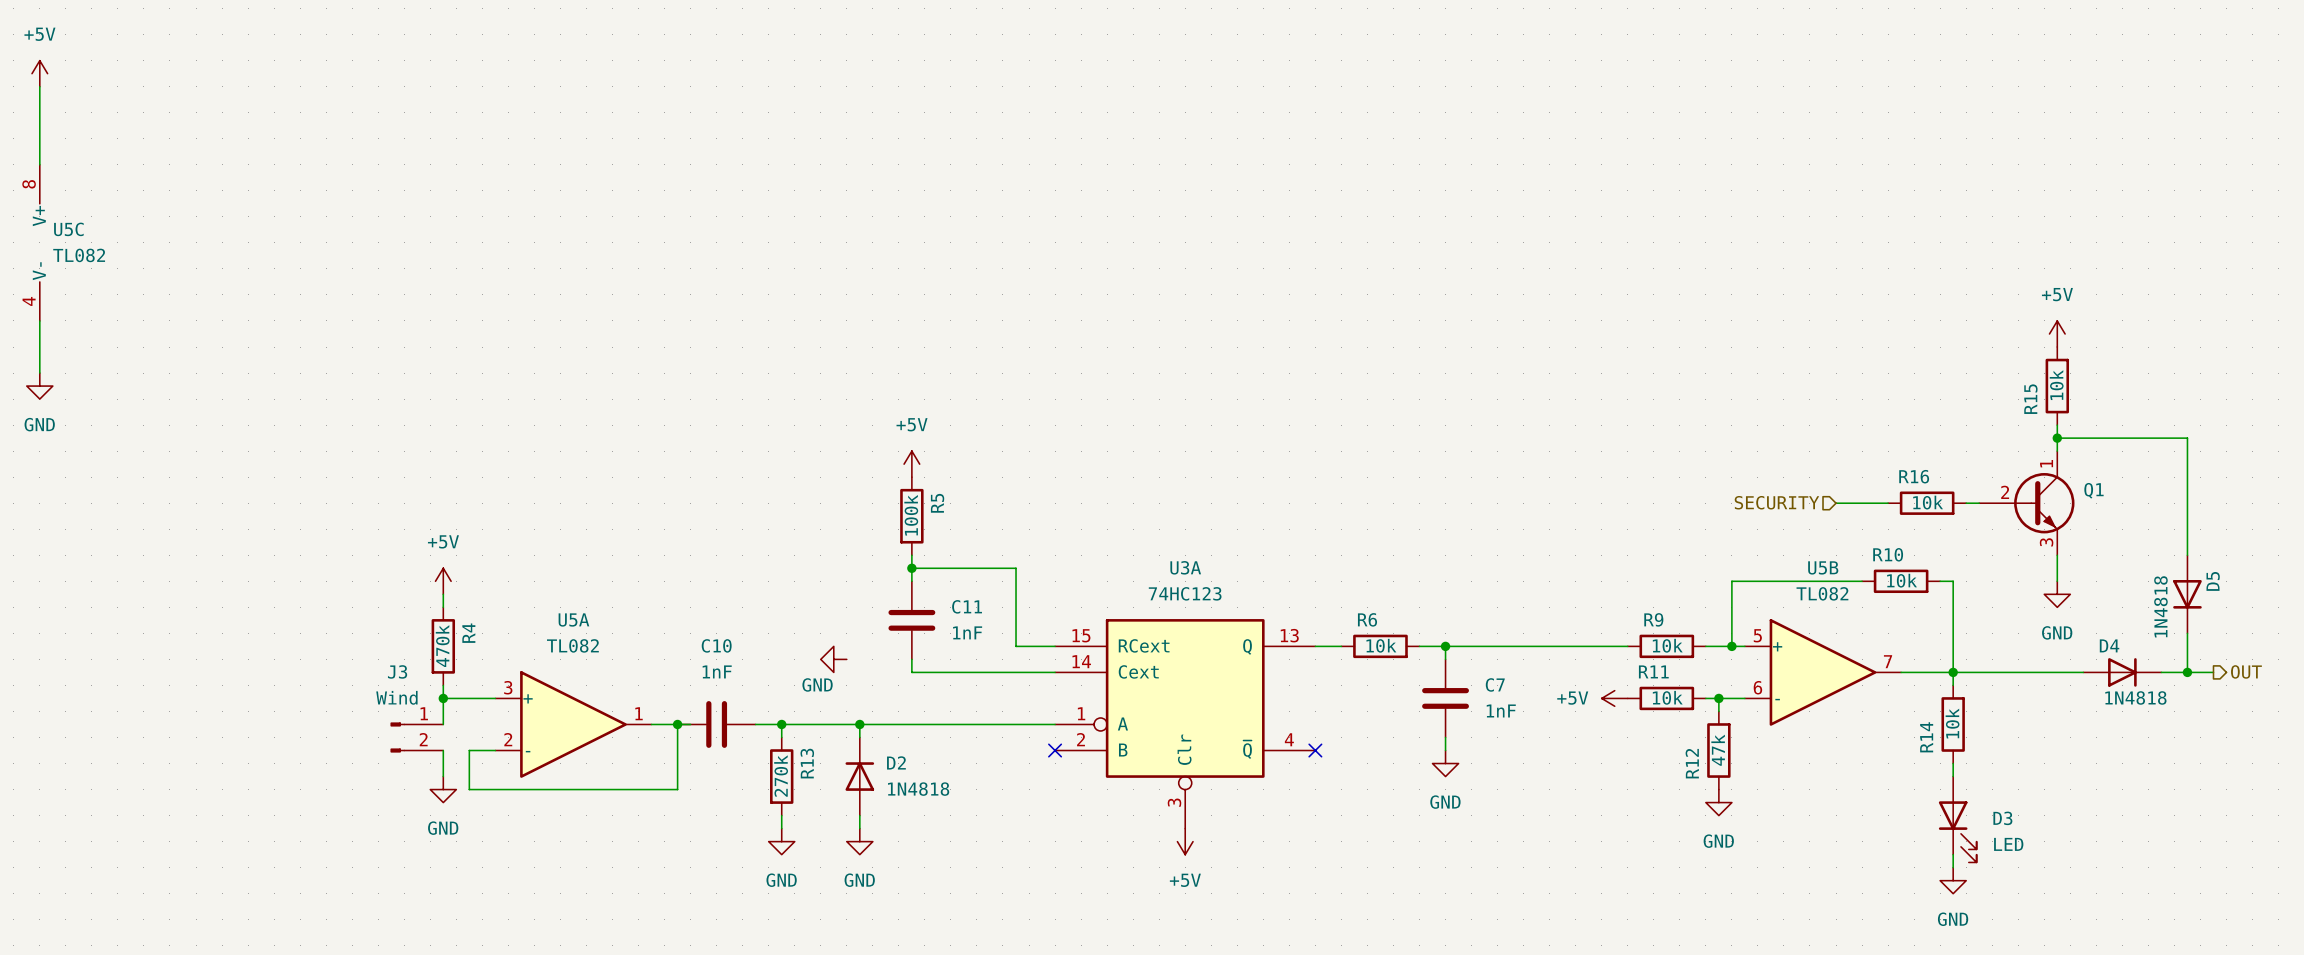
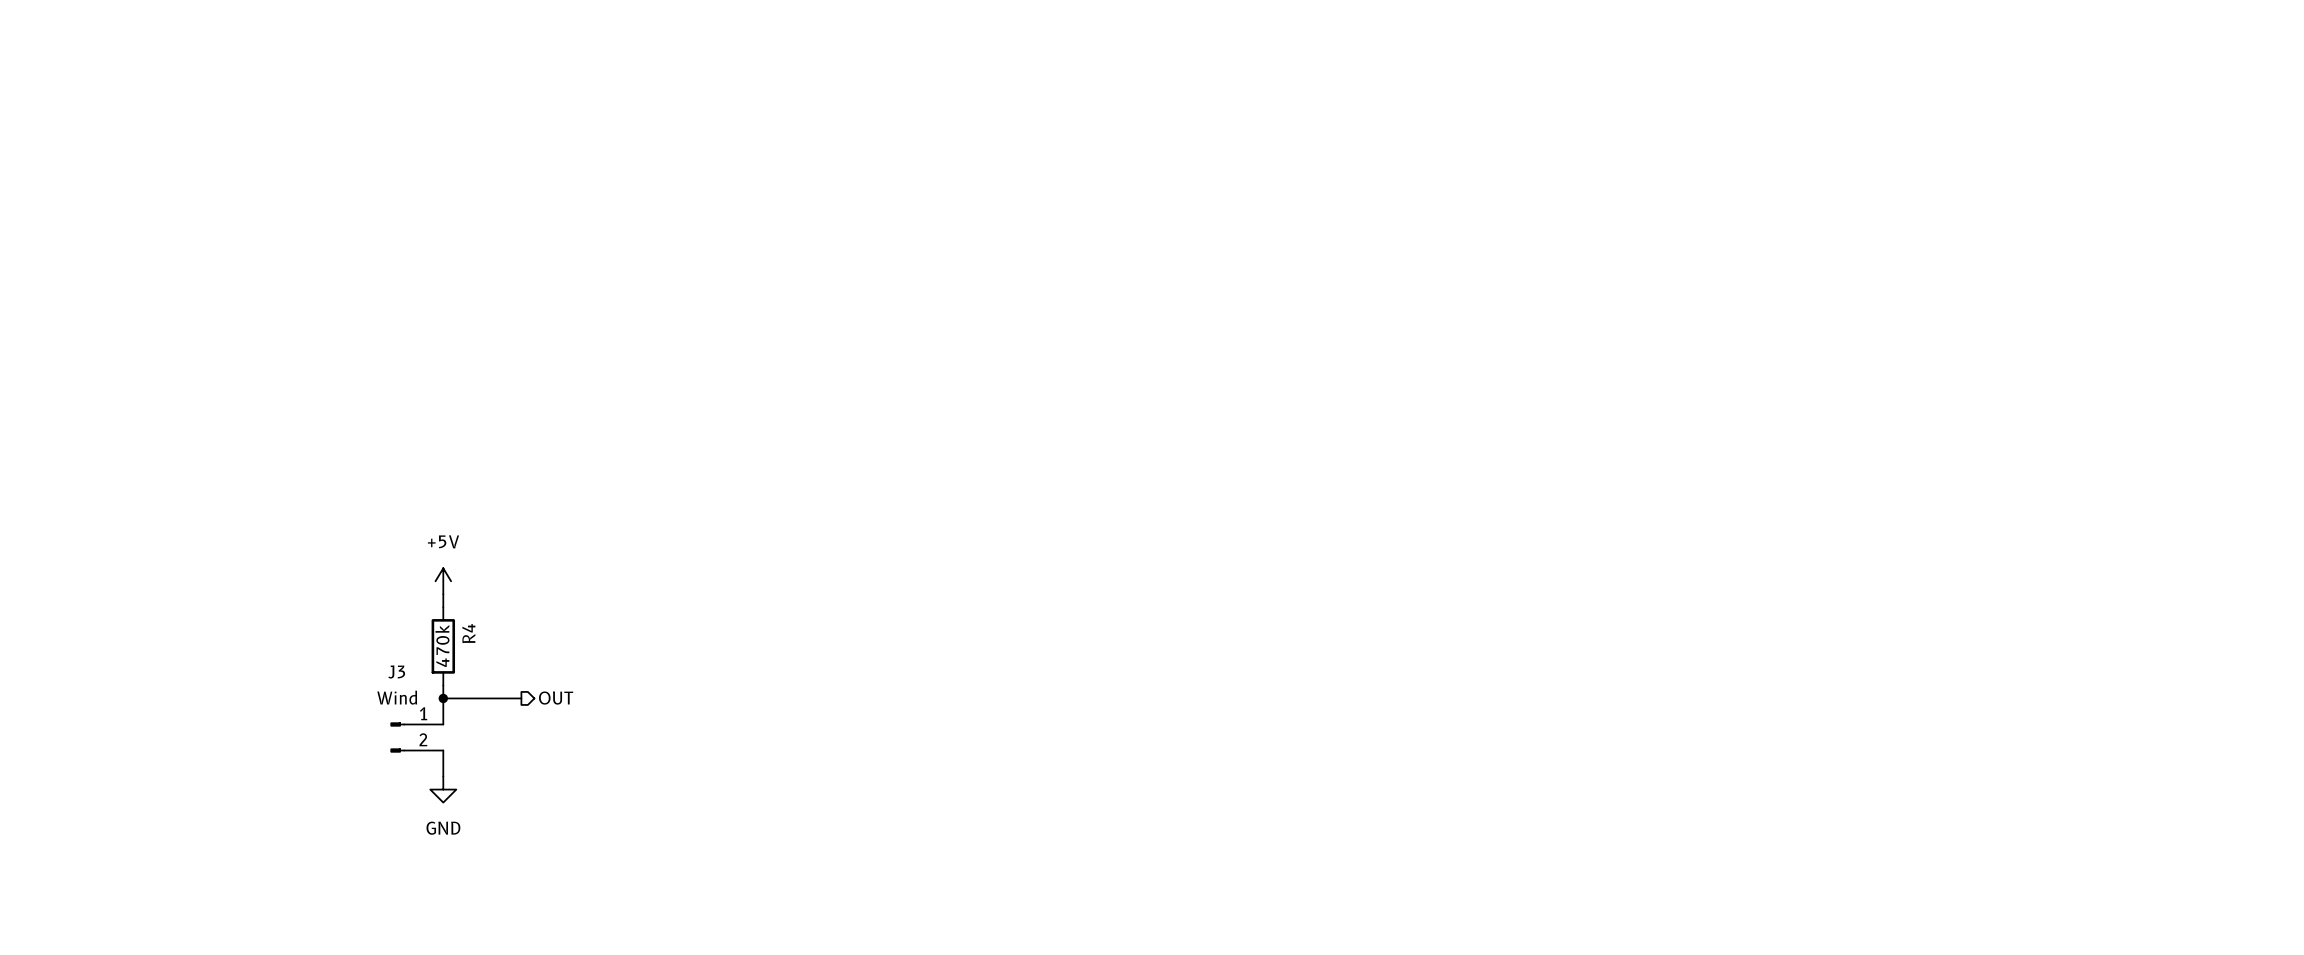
power symbol: +5V (39, 73) -> none
wire: (39, 86) (39, 164) -> none
U5C: TL082 (39, 242) -> none
wire: (39, 320) (39, 373) -> none
power symbol: +5V (2057, 334) -> none
power symbol: GND (39, 386) -> none
R15: 10k (2057, 386) -> none
wire: (2057, 425) (2057, 451) -> none
wire: (2057, 438) (2187, 438) (2187, 555) -> none
junction: (2057, 438) -> none
power symbol: +5V (911, 464) -> none
hierarchical label: SECURITY (1776, 502) -> none
wire: (1836, 503) (1888, 503) -> none
R16: 10k (1927, 503) -> none
wire: (1966, 503) (1979, 503) -> none
Q1: (2026, 503) -> none
R5: 100k (911, 516) -> none
wire: (911, 555) (911, 581) -> none
wire: (2057, 555) (2057, 581) -> none
wire: (911, 568) (1016, 568) (1016, 646) (1055, 646) -> none
junction: (911, 568) -> none
wire: (1862, 581) (1731, 581) (1731, 646) -> none
R10: 10k (1901, 581) -> none
wire: (1940, 581) (1953, 581) (1953, 685) -> none
power symbol: GND (2057, 594) -> none
D5: 1N4818 (2187, 594) -> none
C11: 1nF (911, 620) -> none
wire: (2187, 633) (2187, 672) -> none
wire: (1315, 646) (1341, 646) -> none
R6: 10k (1380, 646) -> none
wire: (1419, 646) (1627, 646) -> none
wire: (1445, 646) (1445, 659) -> none
junction: (1445, 646) -> none
R9: 10k (1666, 646) -> none
wire: (1705, 646) (1744, 646) -> none
junction: (1731, 646) -> none
power symbol: GND (833, 659) -> none
wire: (911, 659) (911, 672) (1055, 672) -> none
hierarchical label: OUT (2246, 671) -> none
U5B: TL082 (1823, 672) -> none
wire: (1901, 672) (2083, 672) -> none
junction: (1953, 672) -> none
D4: 1N4818 (2122, 672) -> none
wire: (2161, 672) (2213, 672) -> none
junction: (2187, 672) -> none
hierarchical label: none -> OUT (556, 698)
C7: 1nF (1445, 698) -> none
power symbol: +5V (1614, 698) -> none
R11: 10k (1666, 698) -> none
wire: (1705, 698) (1744, 698) -> none
wire: (1718, 698) (1718, 711) -> none
junction: (1718, 698) -> none
U3A: 74HC123 (1185, 723) -> none
U5A: TL082 (573, 724) -> none
wire: (651, 724) (690, 724) -> none
wire: (677, 724) (677, 789) (469, 789) (469, 750) (495, 750) -> none
junction: (677, 724) -> none
C10: 1nF (716, 724) -> none
wire: (755, 724) (1055, 724) -> none
wire: (781, 724) (781, 737) -> none
junction: (781, 724) -> none
wire: (859, 724) (859, 737) -> none
junction: (859, 724) -> none
R14: 10k (1953, 724) -> none
wire: (1445, 737) (1445, 750) -> none
no-connect mark: (1055, 750) -> none
no-connect mark: (1315, 750) -> none
R12: 47k (1718, 750) -> none
power symbol: GND (1445, 763) -> none
wire: (1953, 763) (1953, 776) -> none
R13: 270k (781, 776) -> none
D2: 1N4818 (859, 776) -> none
power symbol: GND (1718, 802) -> none
wire: (781, 815) (781, 828) -> none
wire: (859, 815) (859, 828) -> none
D3: LED (1957, 819) -> none
power symbol: GND (781, 841) -> none
power symbol: GND (859, 841) -> none
power symbol: +5V (1185, 841) -> none
wire: (1953, 854) (1953, 867) -> none
power symbol: GND (1953, 880) -> none

